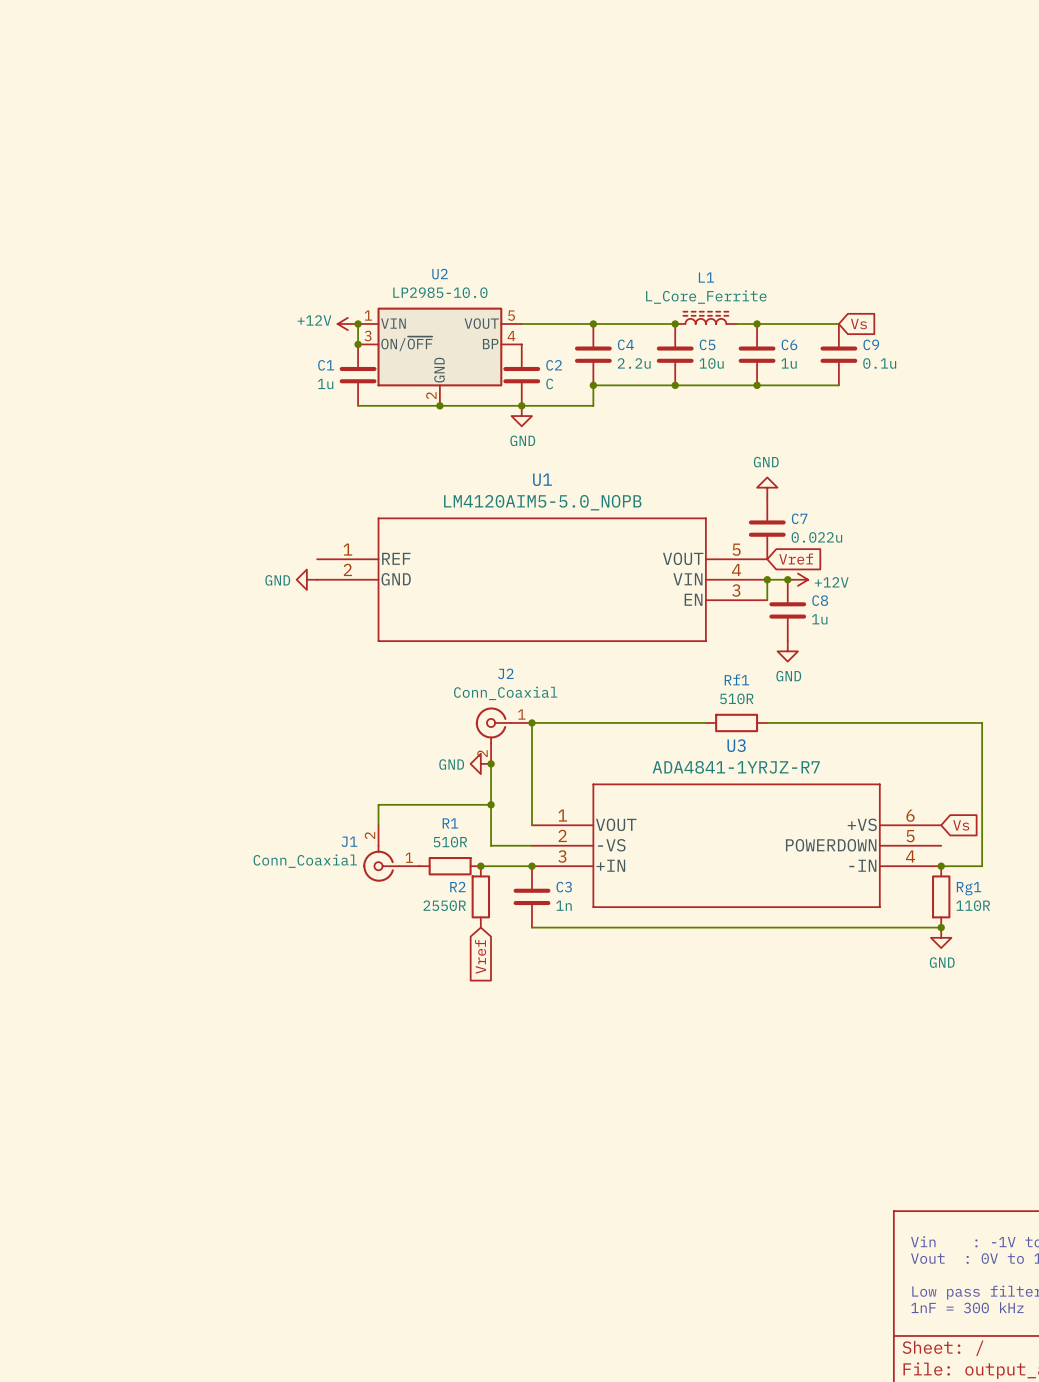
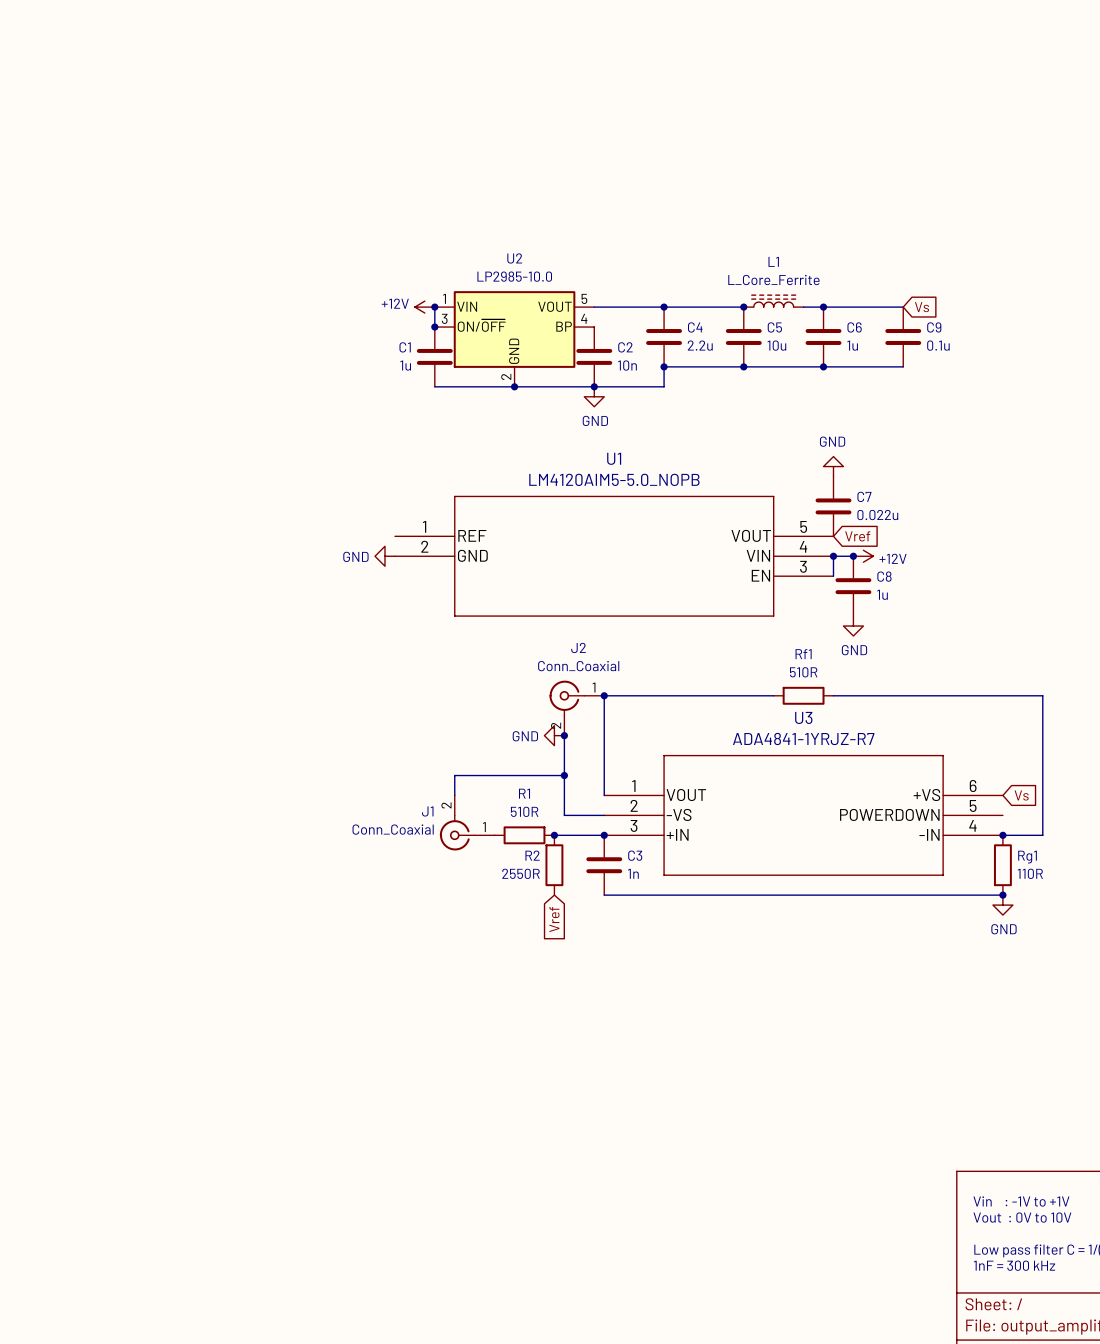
C2 value: C (549, 383) -> 10n (627, 365)

